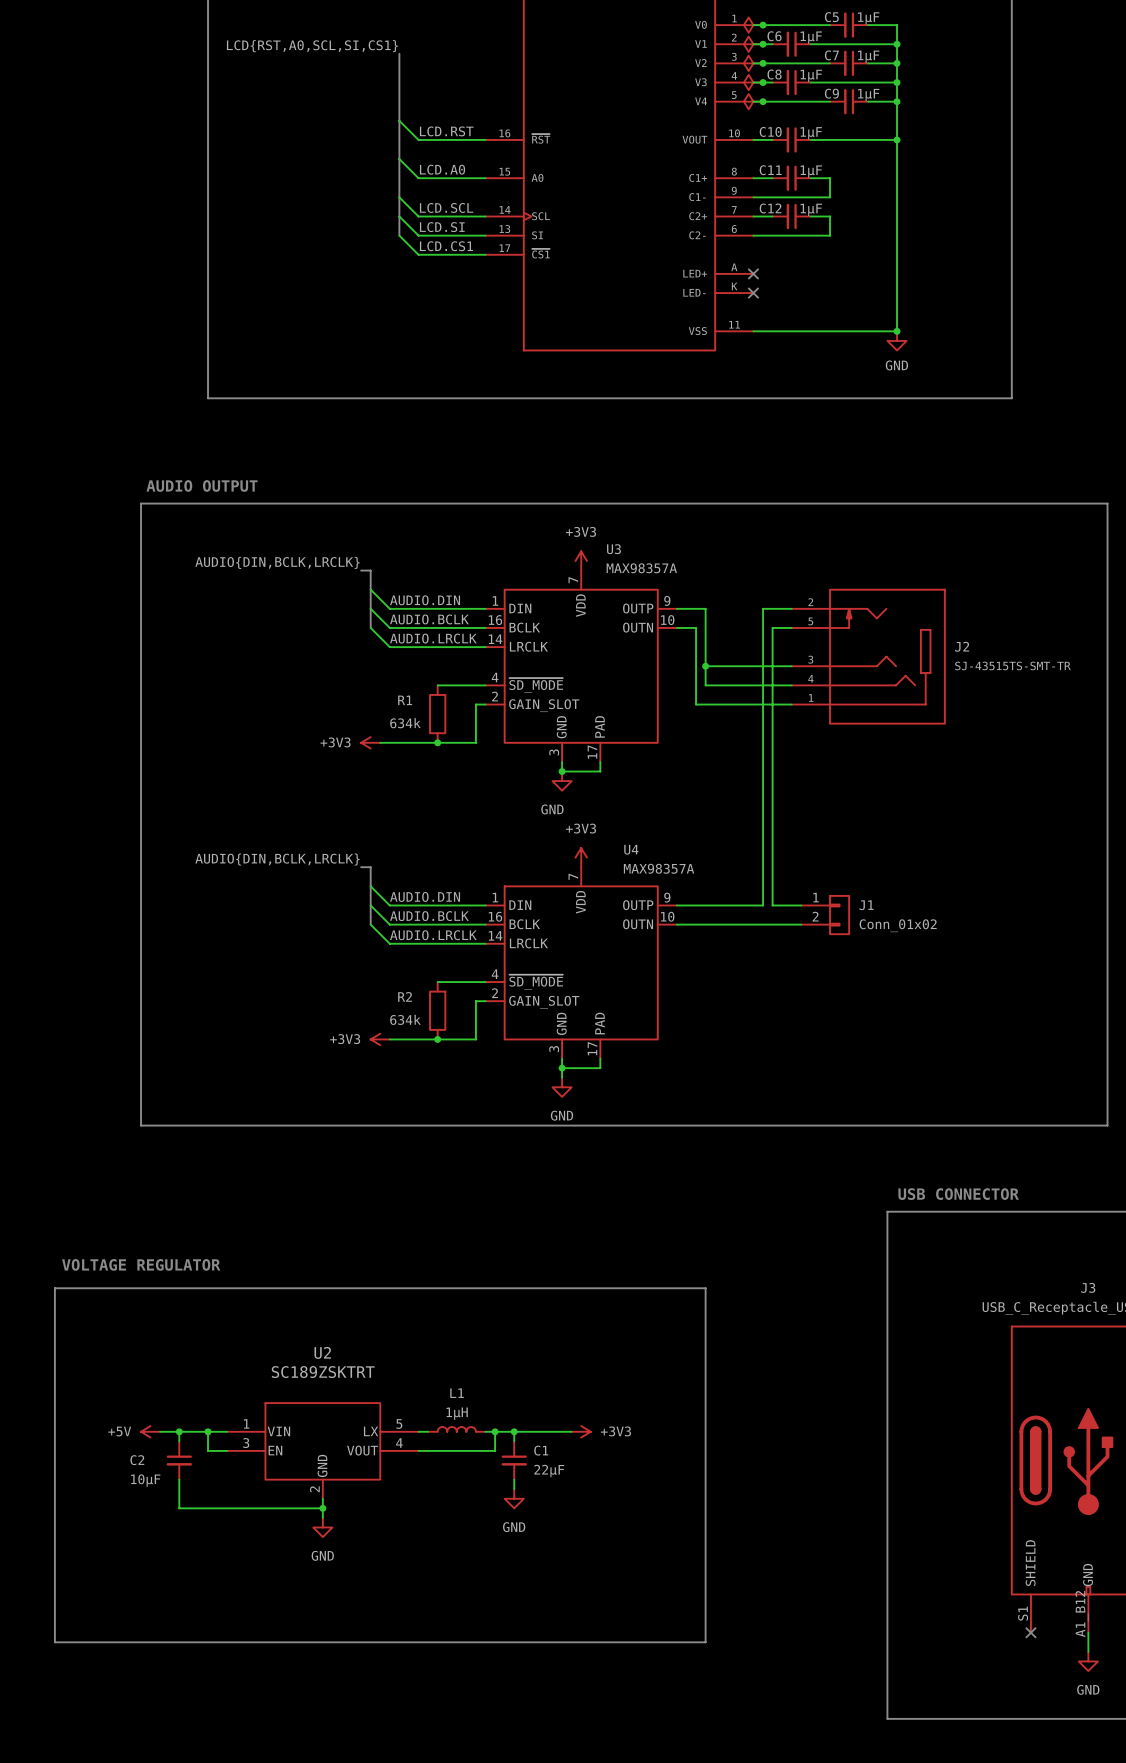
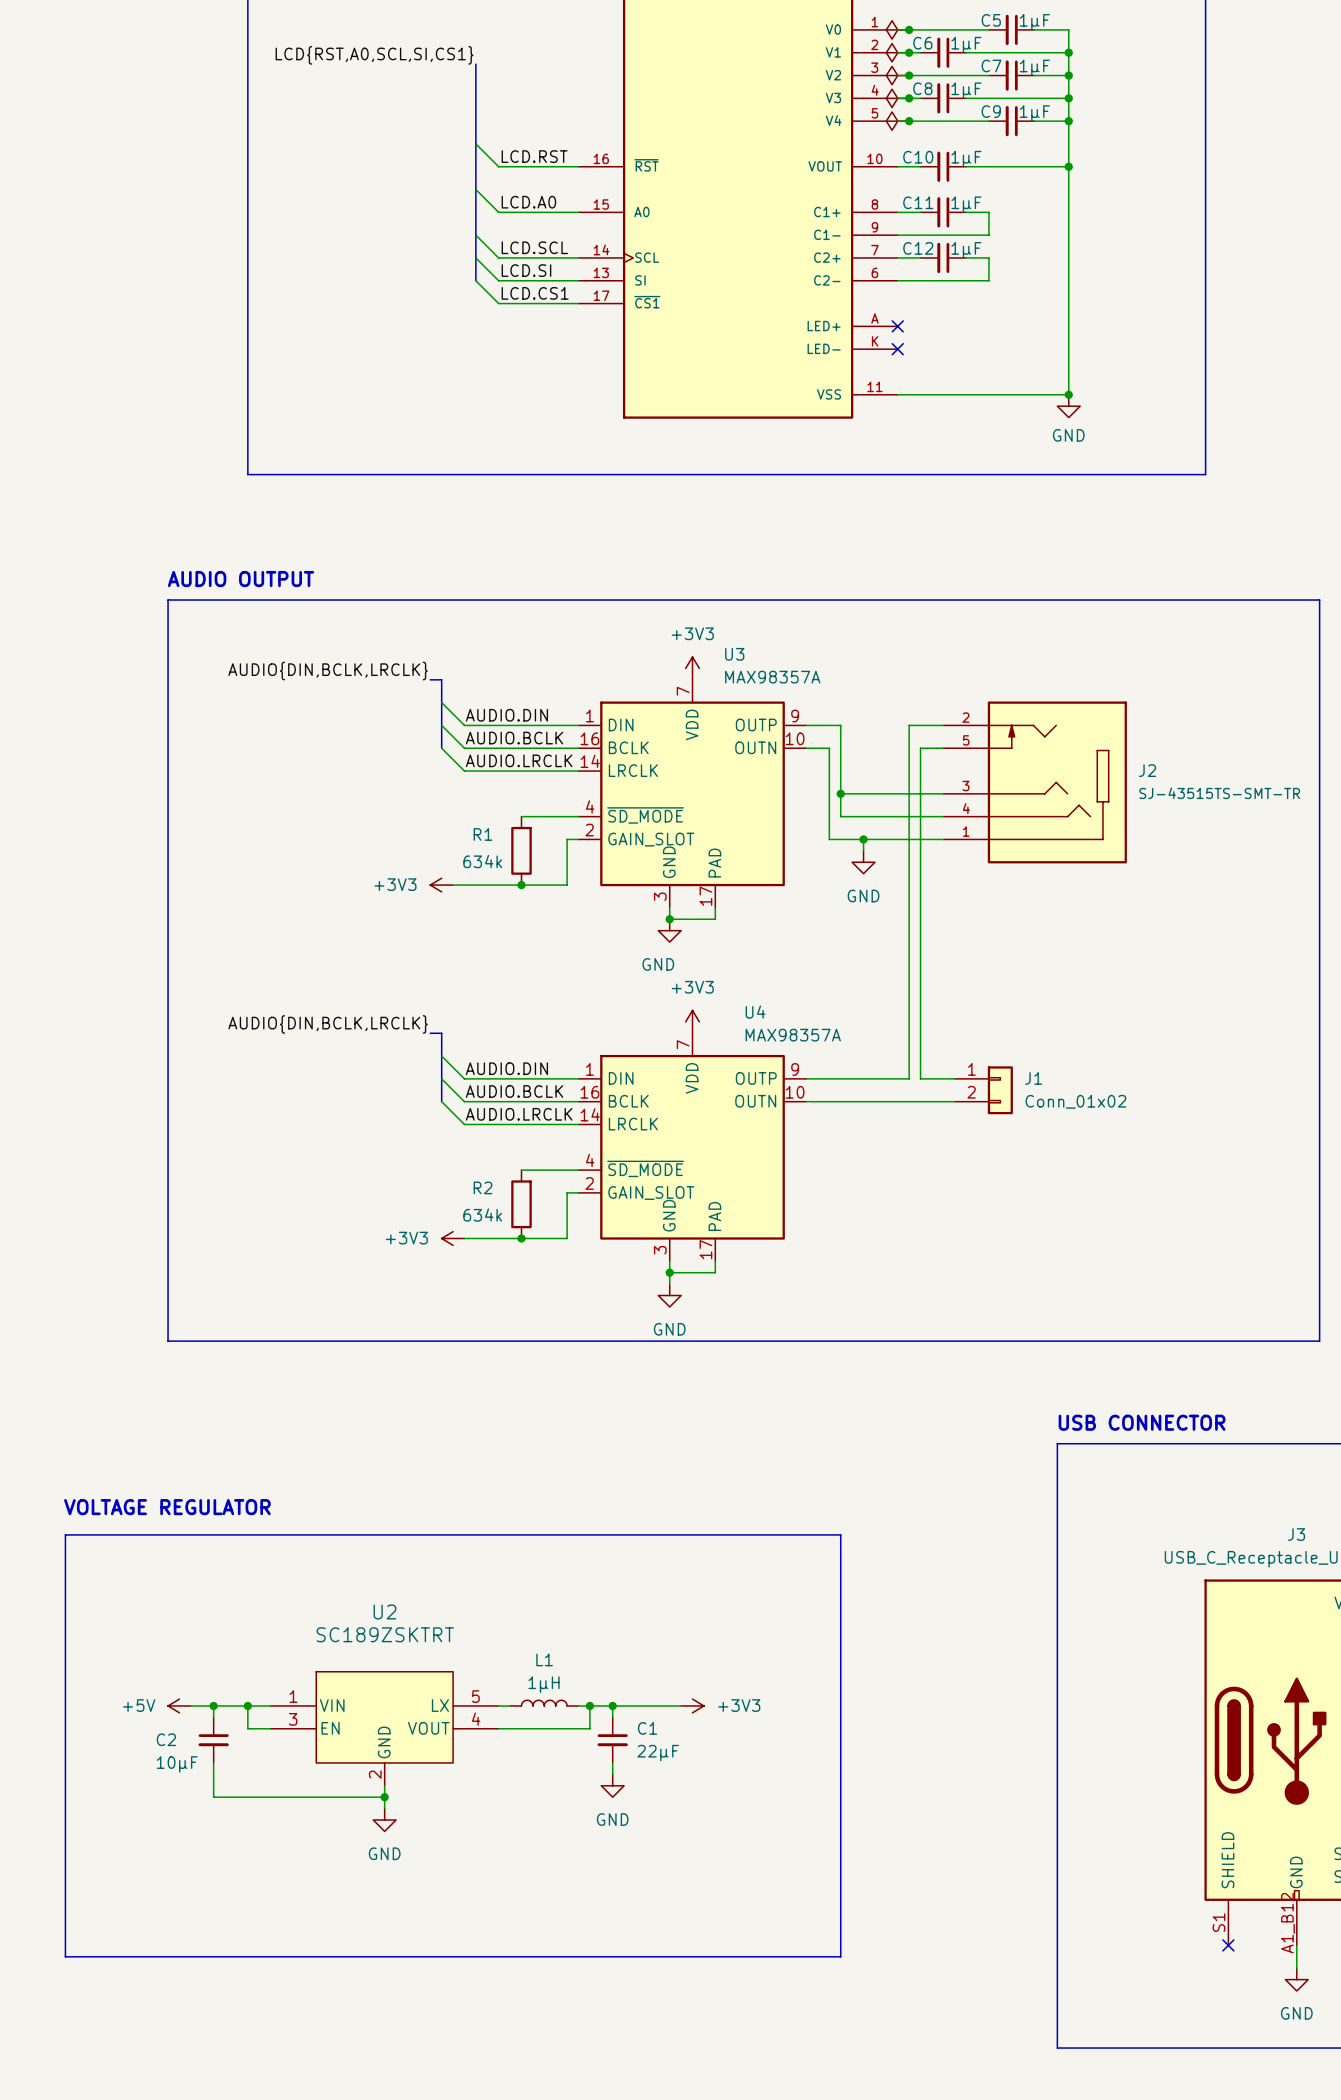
wire: none -> (863, 839) (863, 850)
junction: none -> (863, 839)
power symbol: none -> GND (863, 862)

